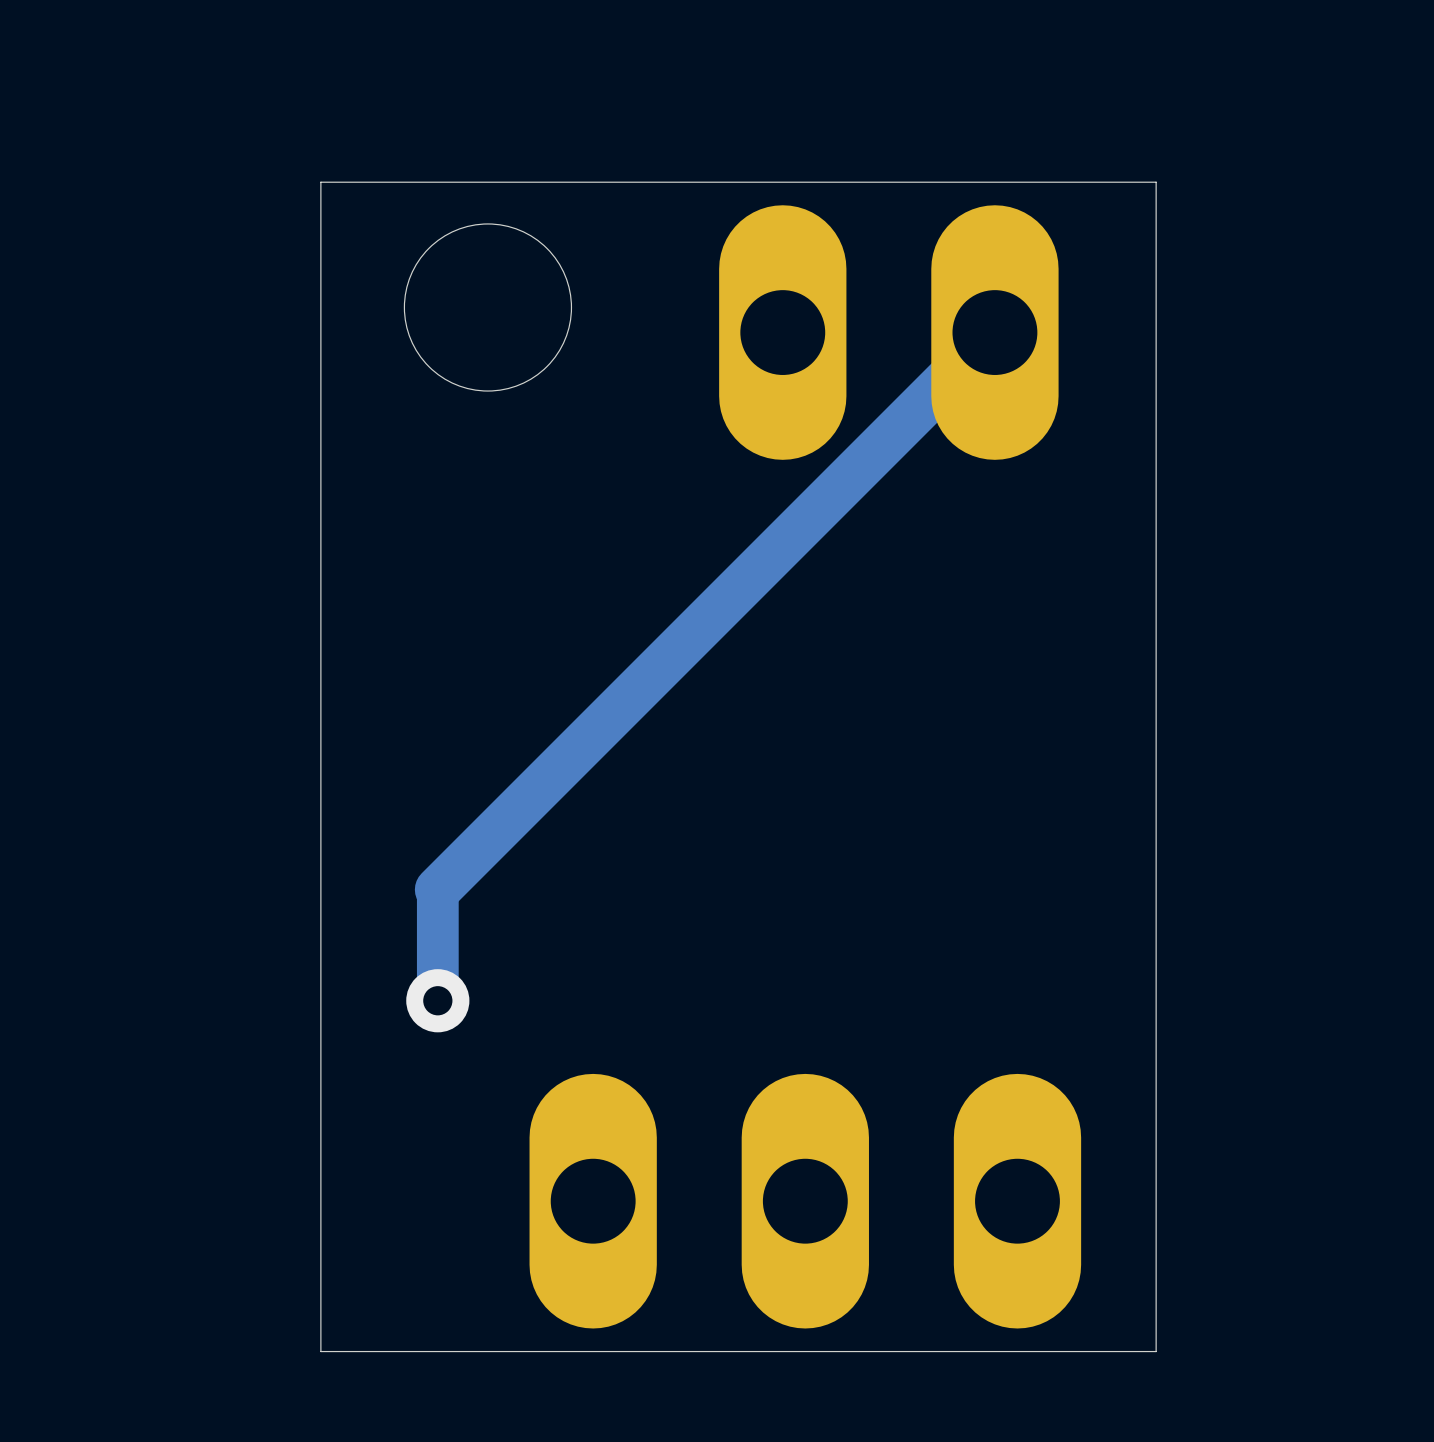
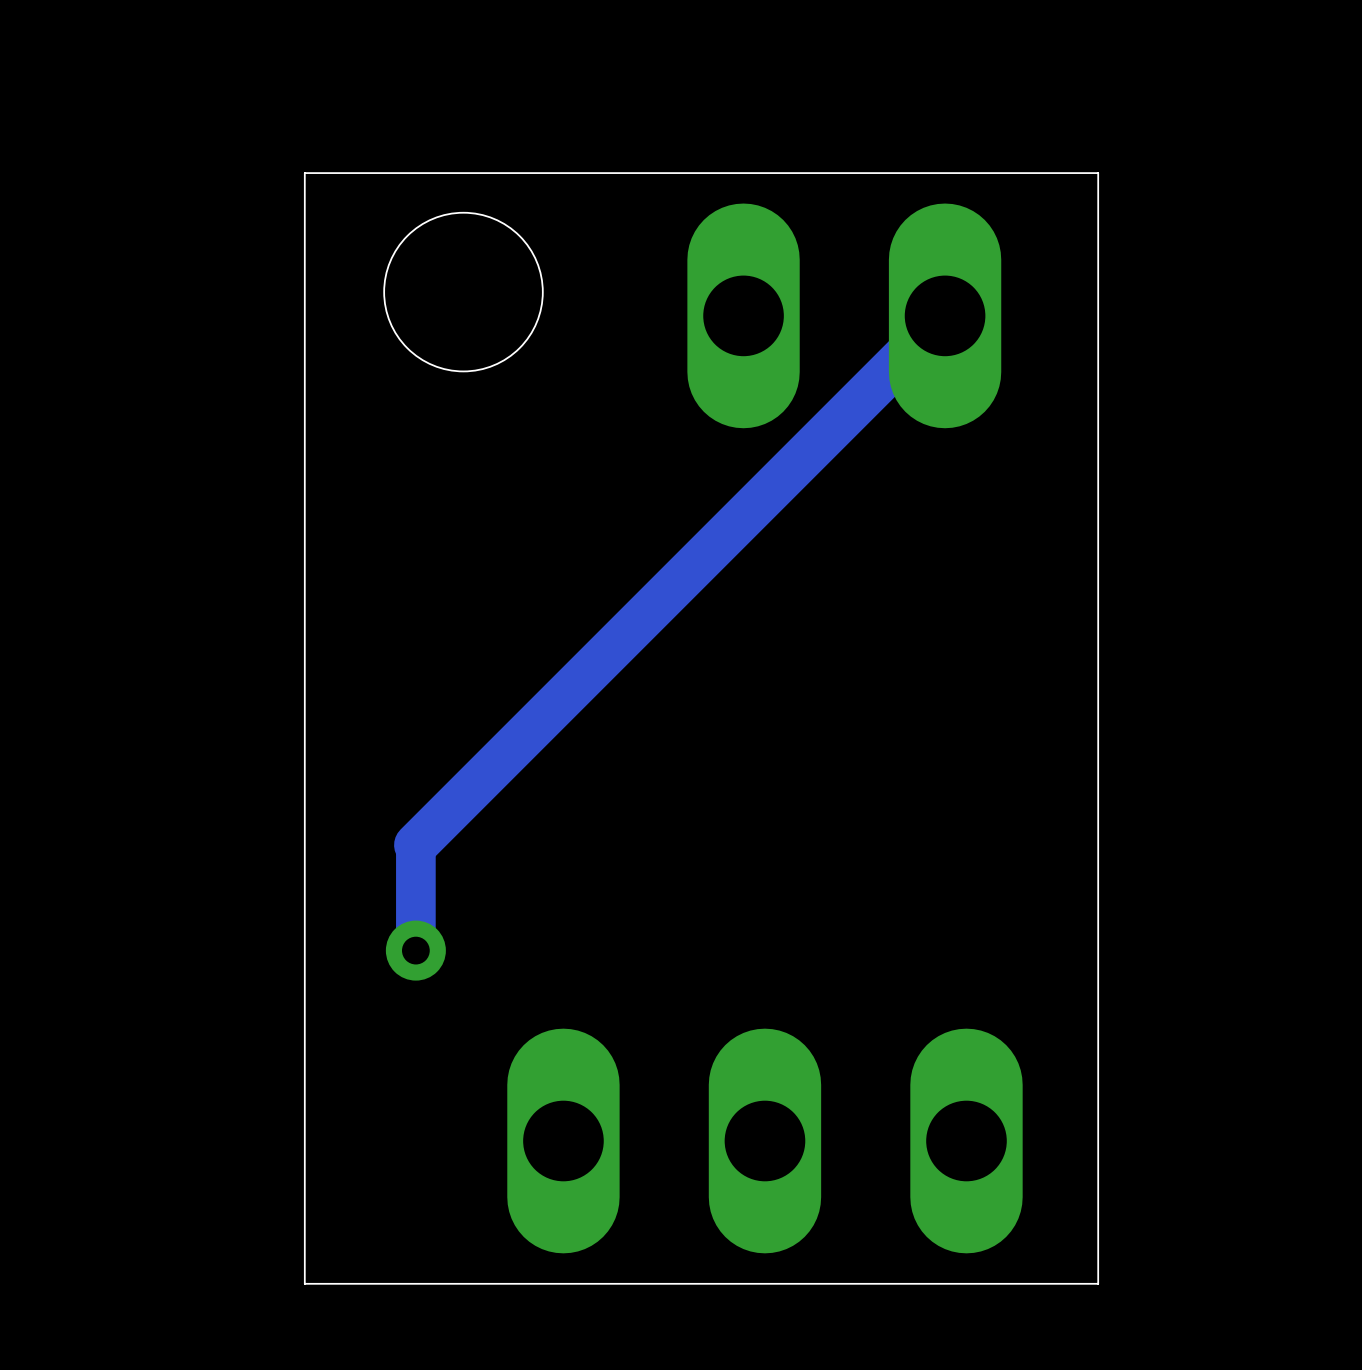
part footprint: [719, 205, 1059, 460] -> [687, 203, 1002, 429]
part footprint: [529, 1073, 1082, 1329] -> [507, 1028, 1023, 1254]

